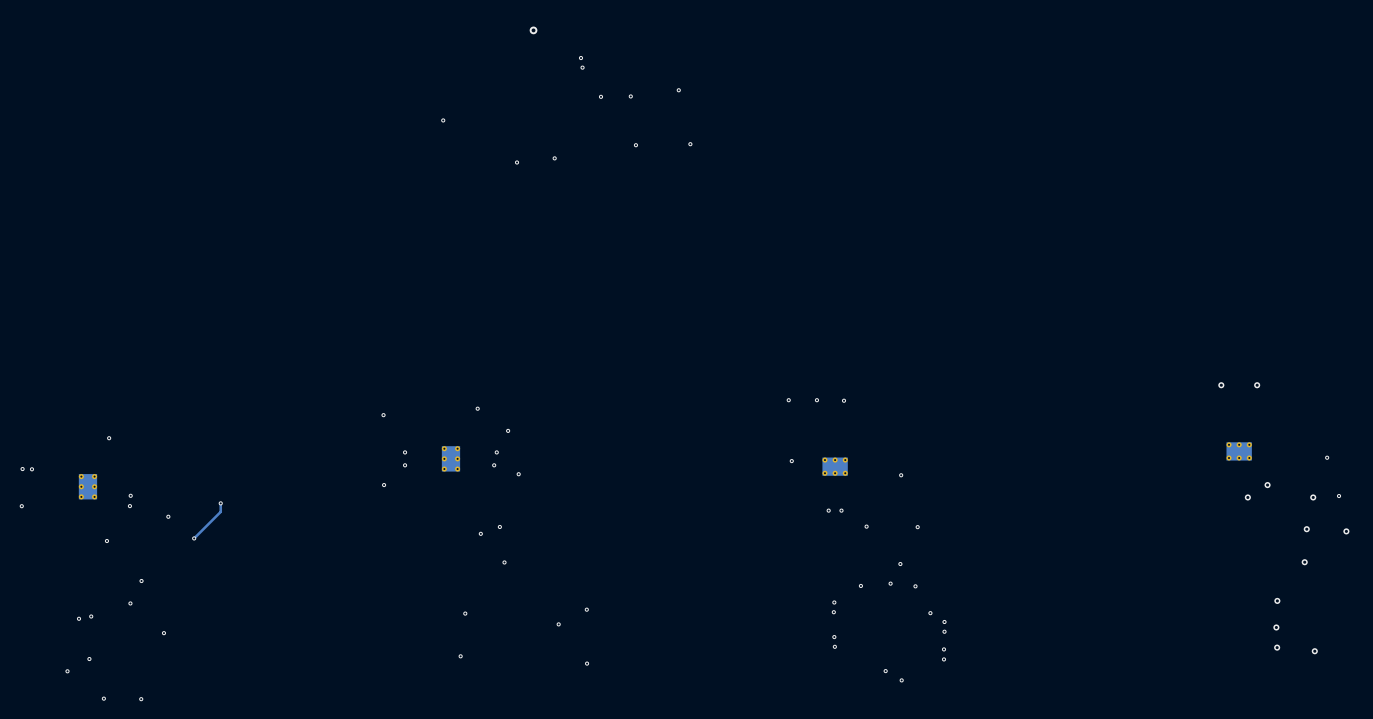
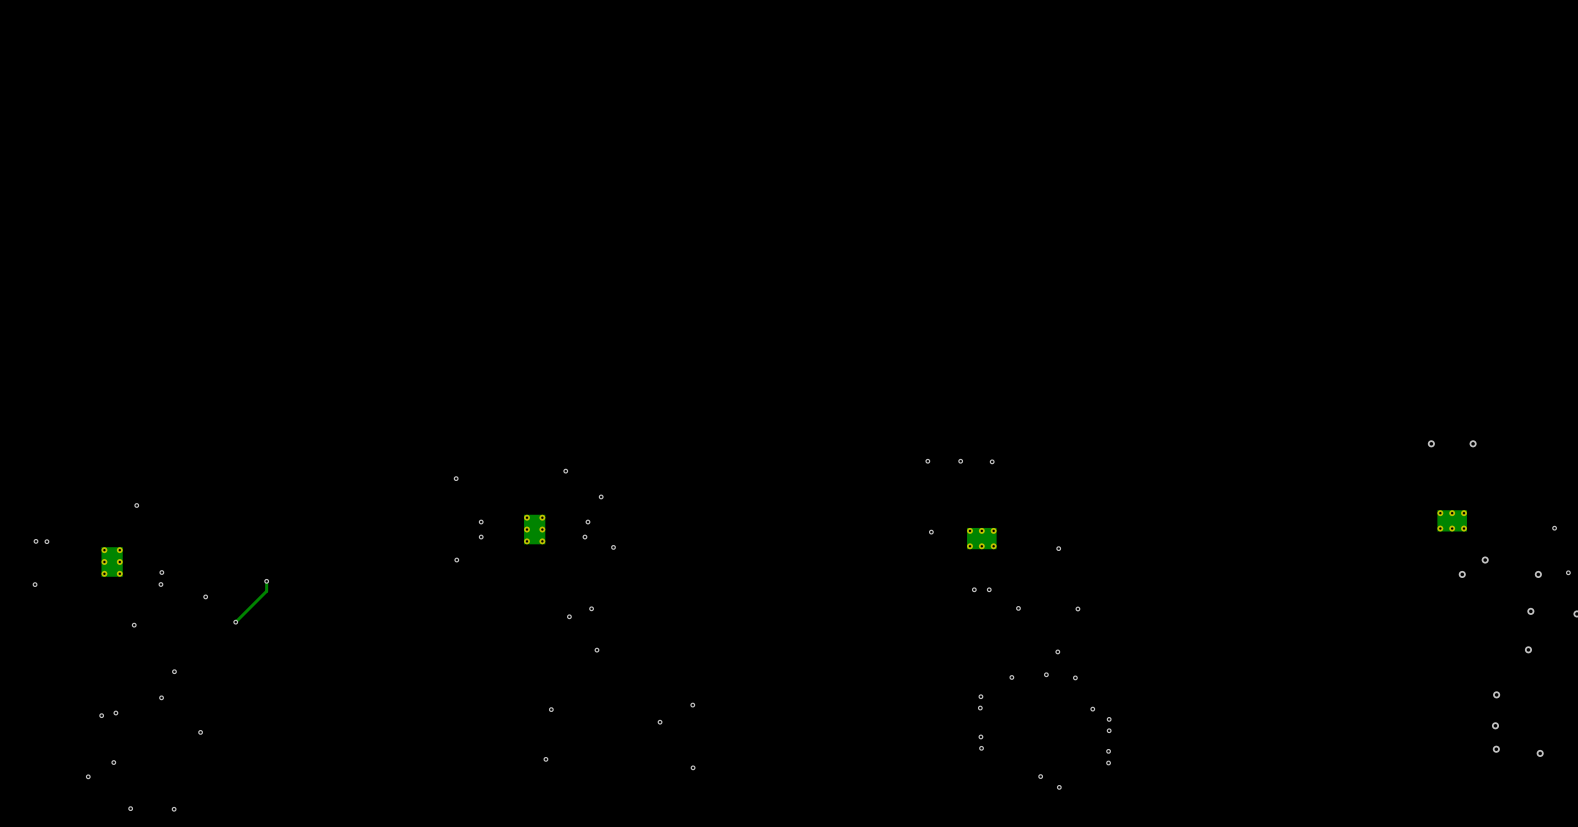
via: (533, 30) -> none
via: (581, 58) -> none
via: (582, 67) -> none
via: (678, 90) -> none
via: (600, 96) -> none
via: (630, 96) -> none
via: (443, 120) -> none
via: (690, 144) -> none
via: (635, 145) -> none
via: (554, 158) -> none
via: (517, 162) -> none

